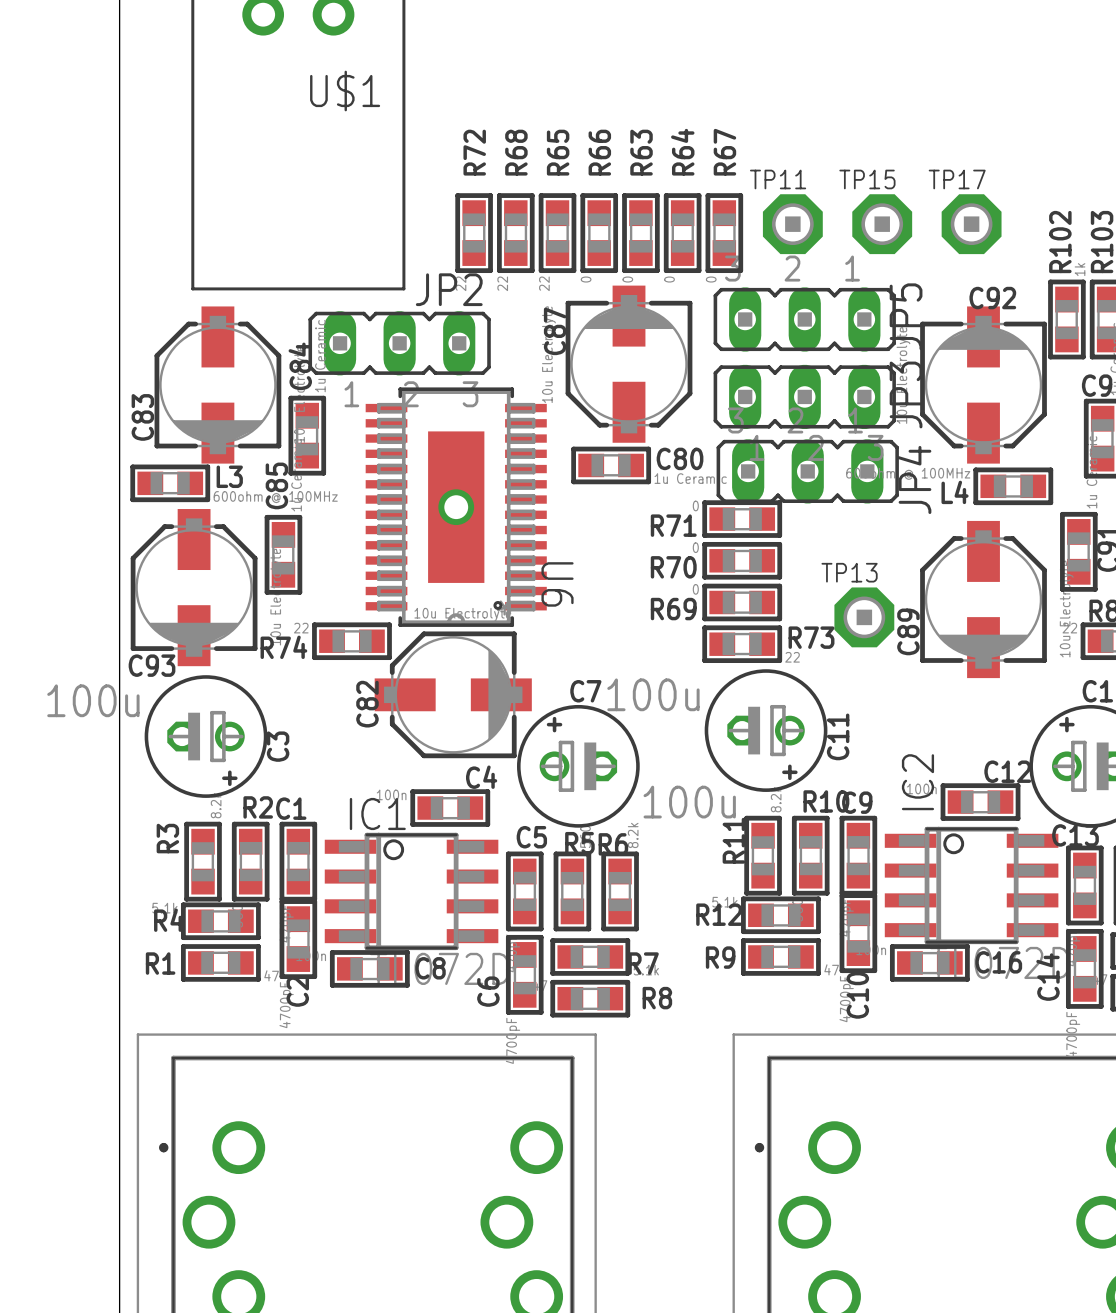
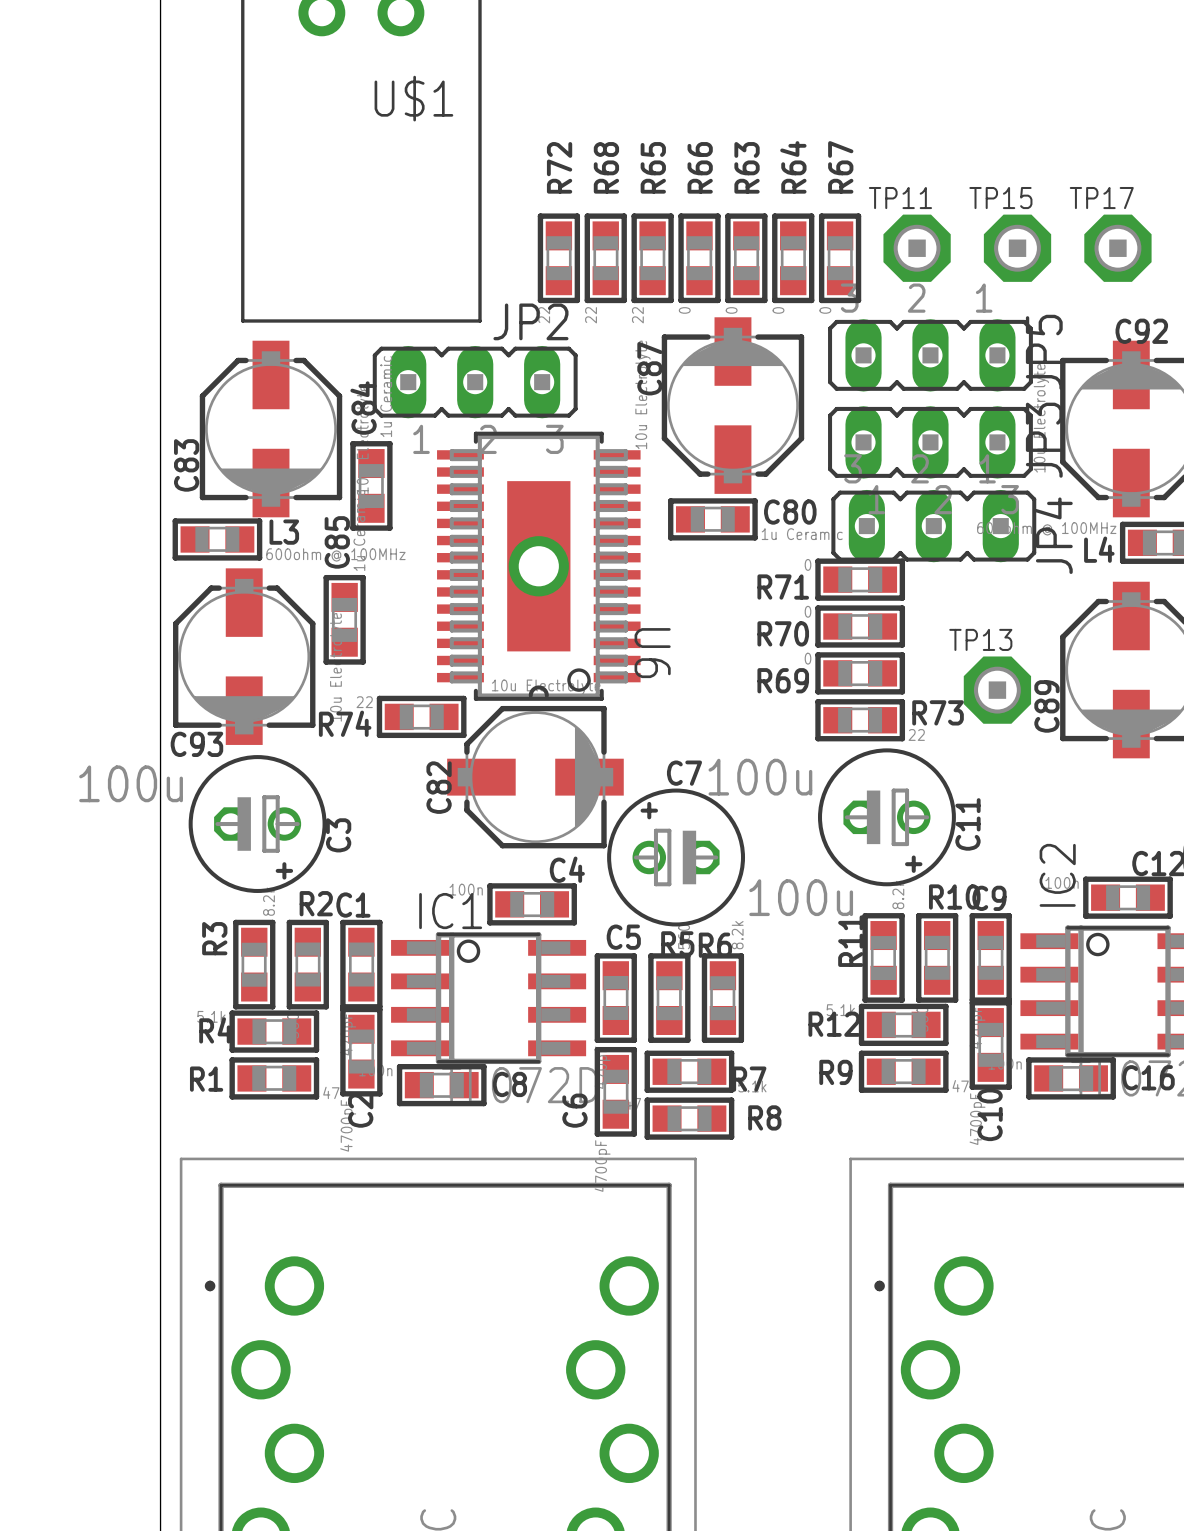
U6 footprint: [365, 387, 547, 627] -> [437, 431, 641, 701]

